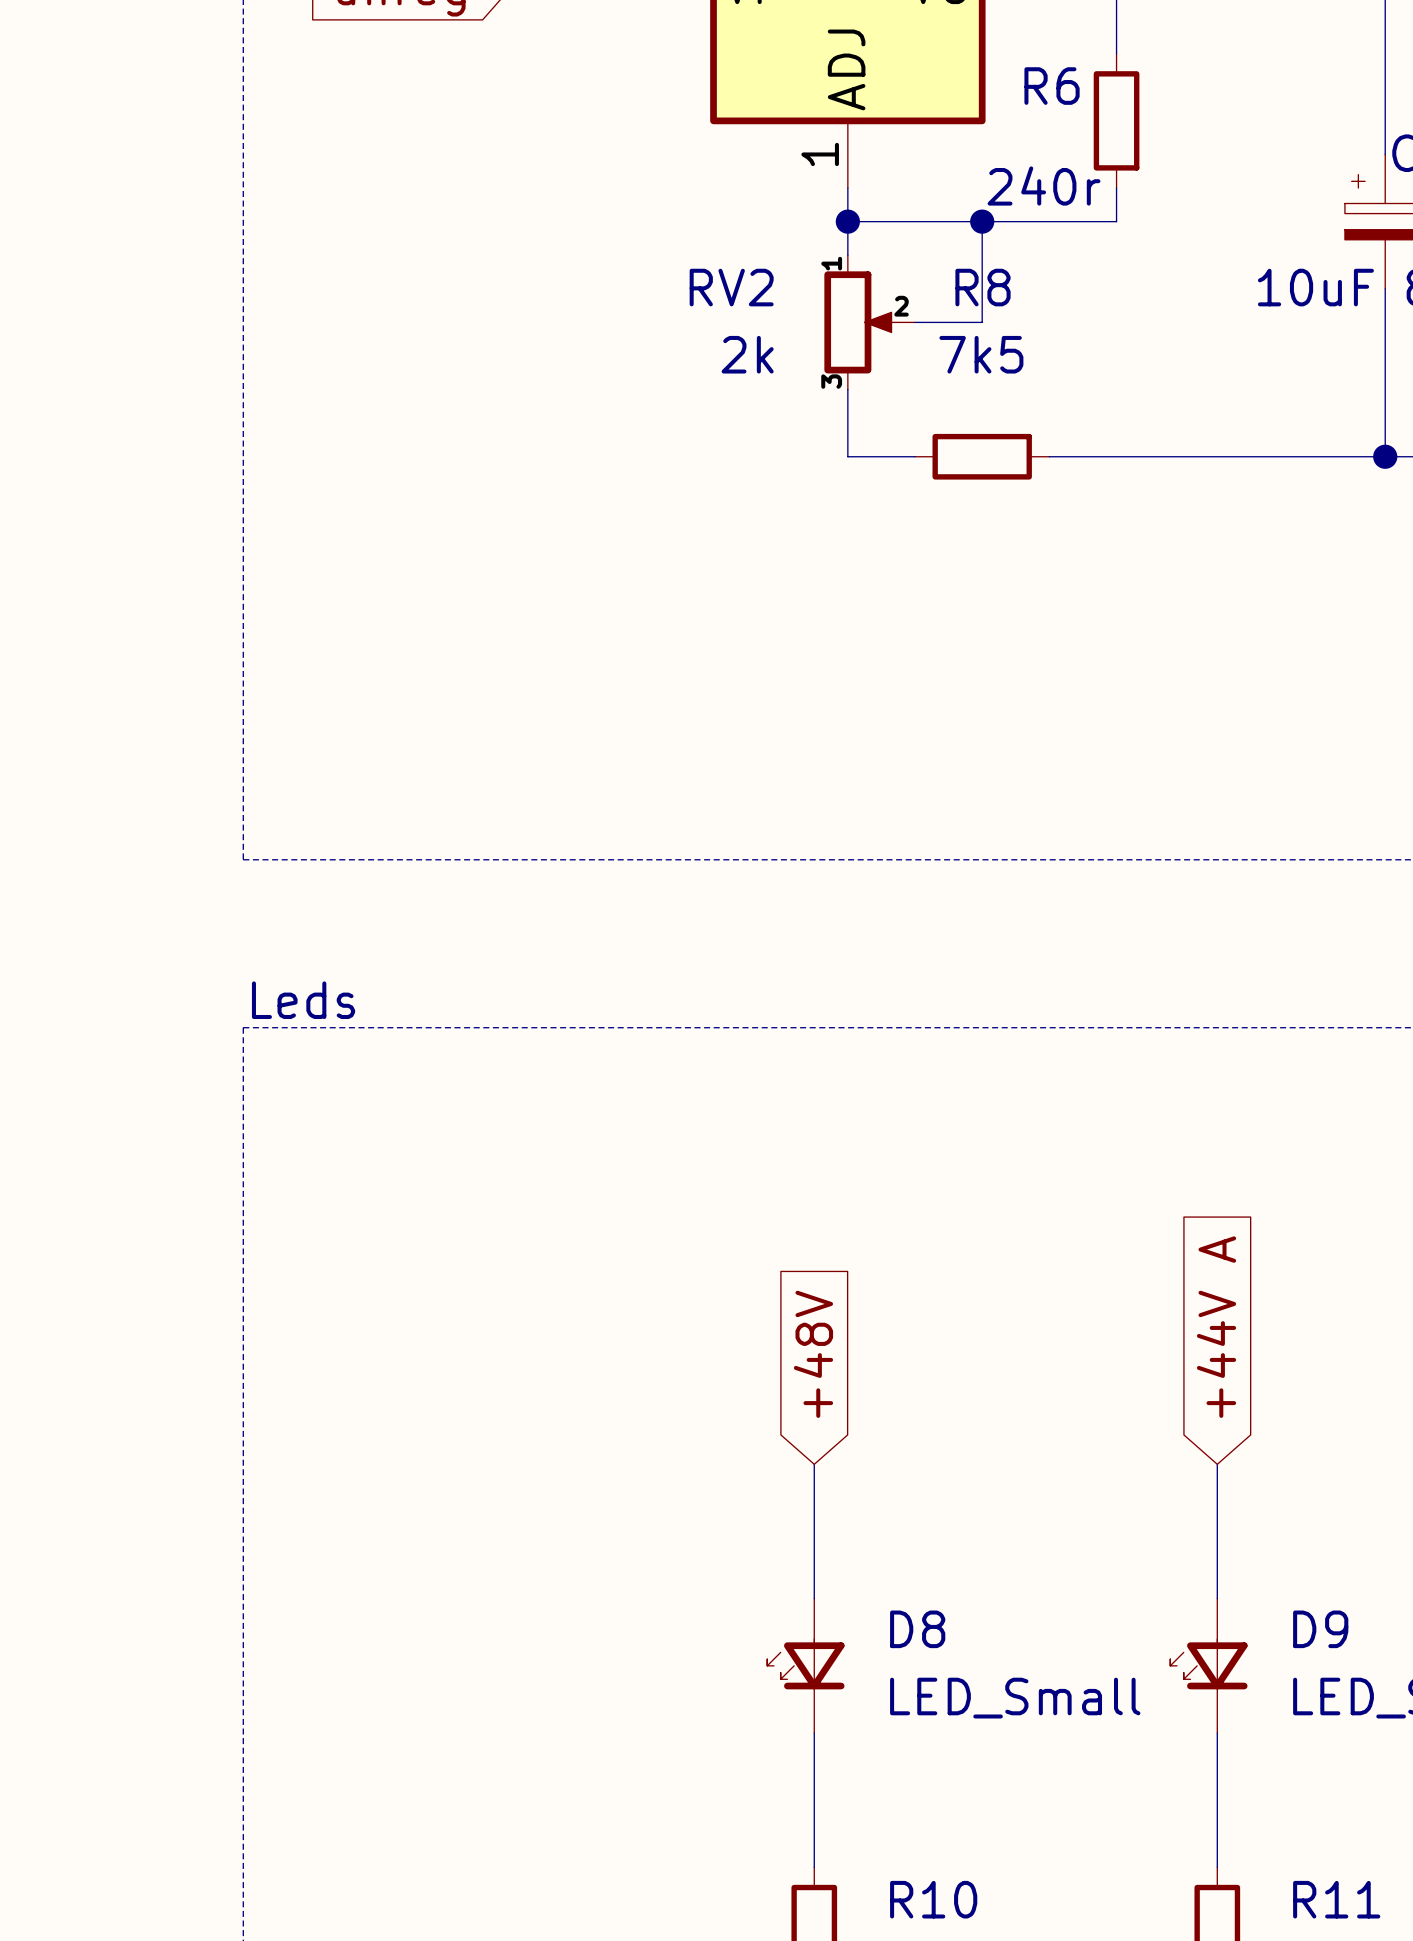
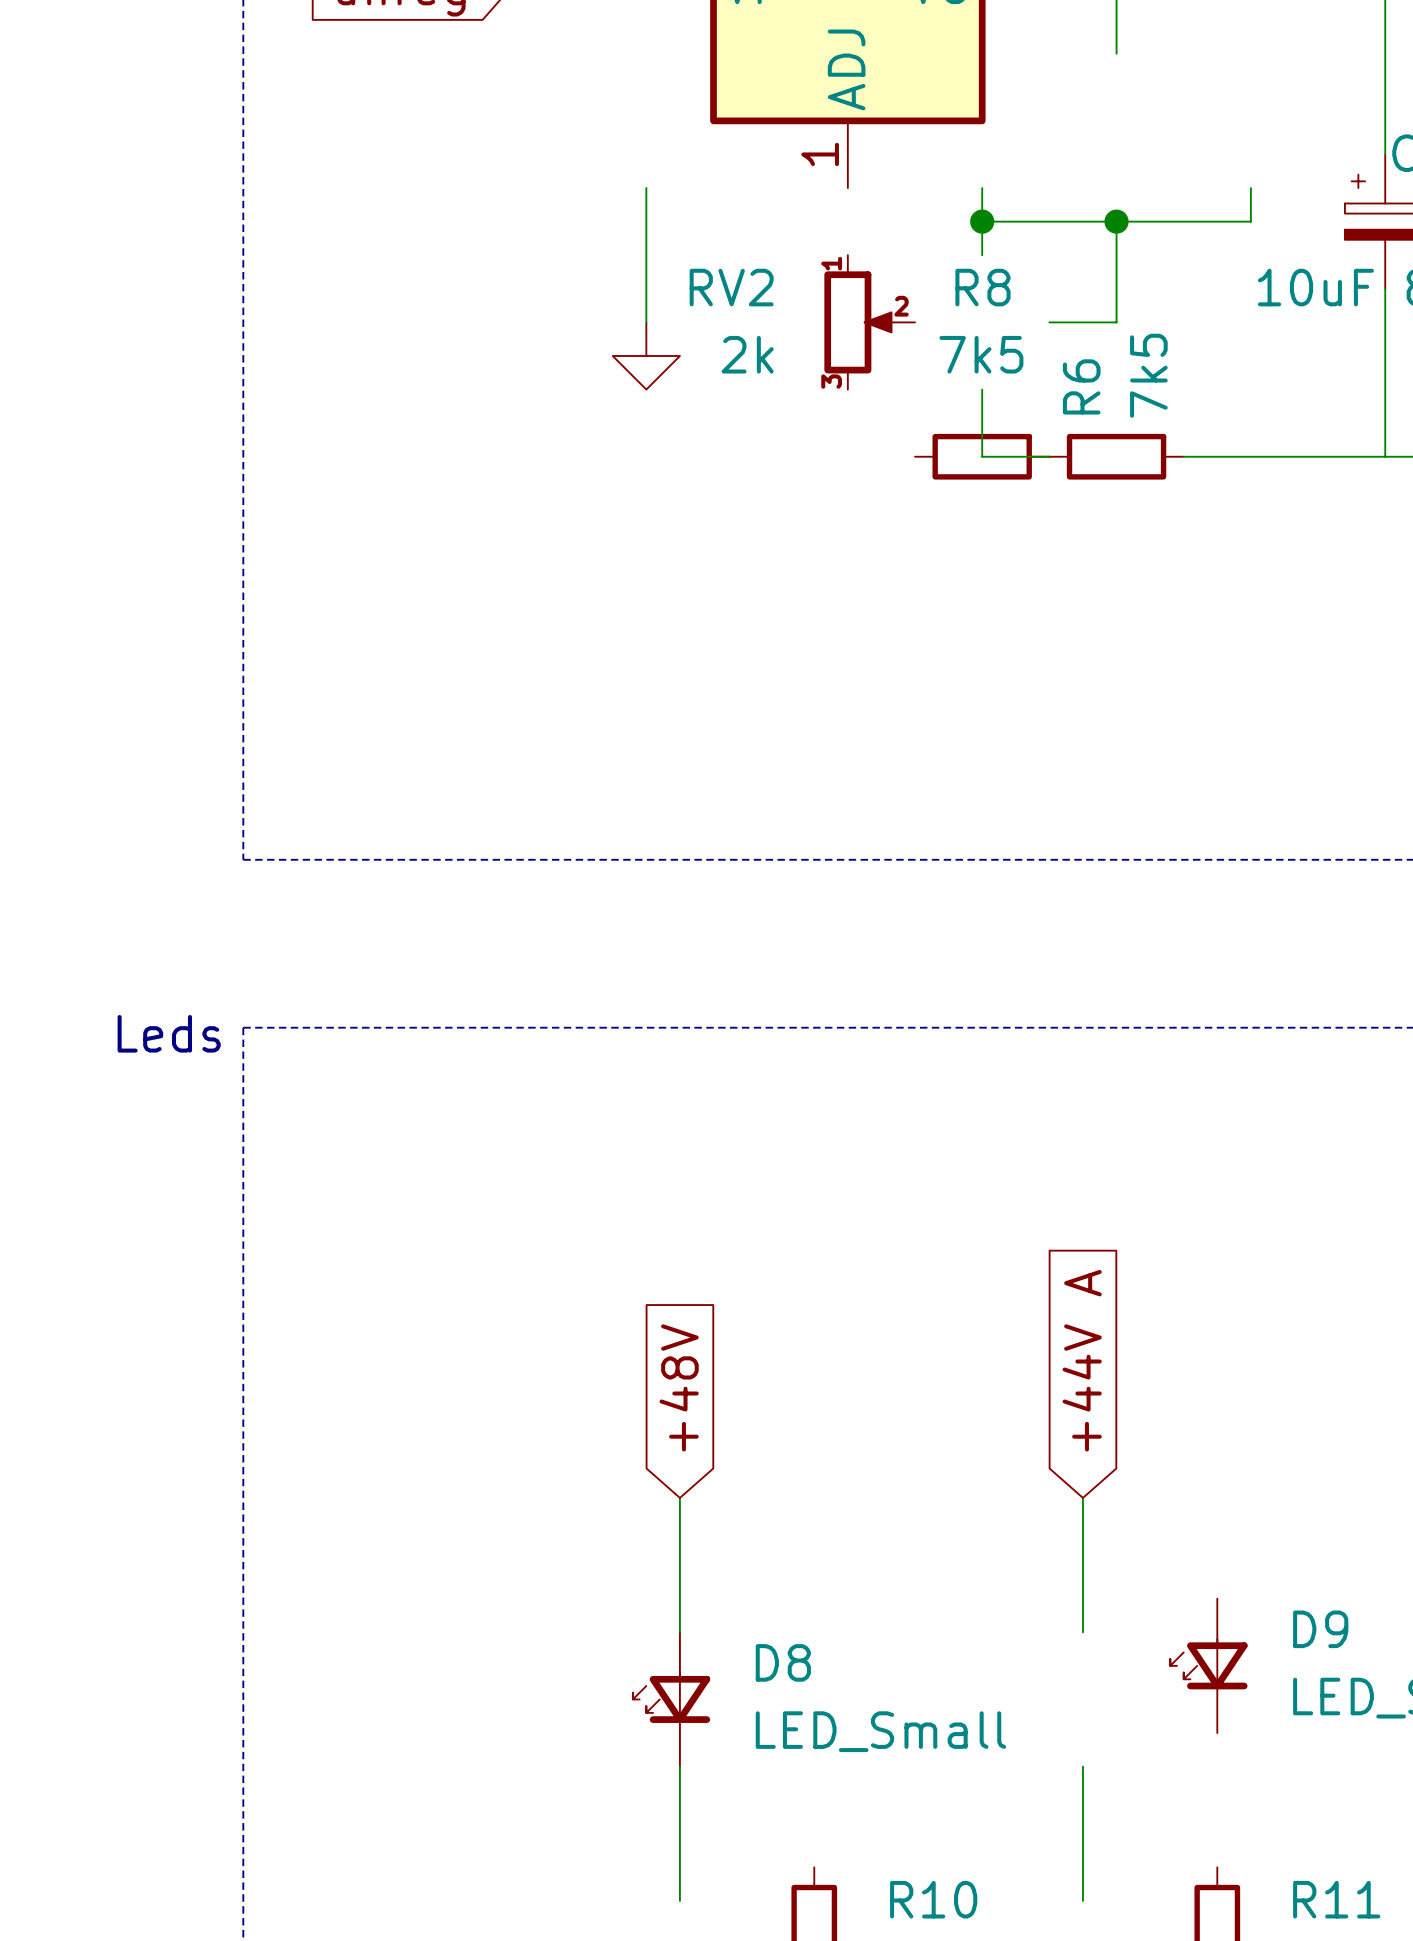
R6 rotation: 0° (1116, 120) -> 90° clockwise (1116, 456)
R6 position: (1116, 120) -> (1116, 456)
R6 value: 240r (1044, 186) -> 7k5 (1148, 375)
wire: none -> (646, 188) (646, 322)
wire: (847, 188) (847, 255) -> none
wire: (1116, 188) (1116, 221) -> none
wire: none -> (1250, 188) (1250, 221) (1116, 221) (1116, 322) (1049, 322)
wire: (847, 221) (982, 221) -> (982, 188) (982, 221)
junction: (847, 221) -> none
junction: none -> (1116, 221)
wire: (982, 255) (982, 322) (915, 322) -> none
power symbol: none -> (646, 355)
wire: (847, 389) (847, 456) (915, 456) -> none
wire: (1049, 456) (1183, 456) -> (1049, 456) (982, 456) (982, 389)
junction: (1385, 456) -> none
text position: Leds (303, 1000) -> Leds (169, 1033)
global label position: +44V A (1216, 1327) -> +44V A (1082, 1360)
global label position: +48V (813, 1354) -> +48V (679, 1387)
wire: (814, 1464) (814, 1598) -> (679, 1497) (679, 1632)
wire: (1217, 1464) (1217, 1598) -> (1082, 1497) (1082, 1632)
D8 position: (805, 1665) -> (671, 1699)
wire: (814, 1733) (814, 1867) -> (679, 1766) (679, 1900)
wire: (1217, 1733) (1217, 1867) -> (1082, 1766) (1082, 1900)

